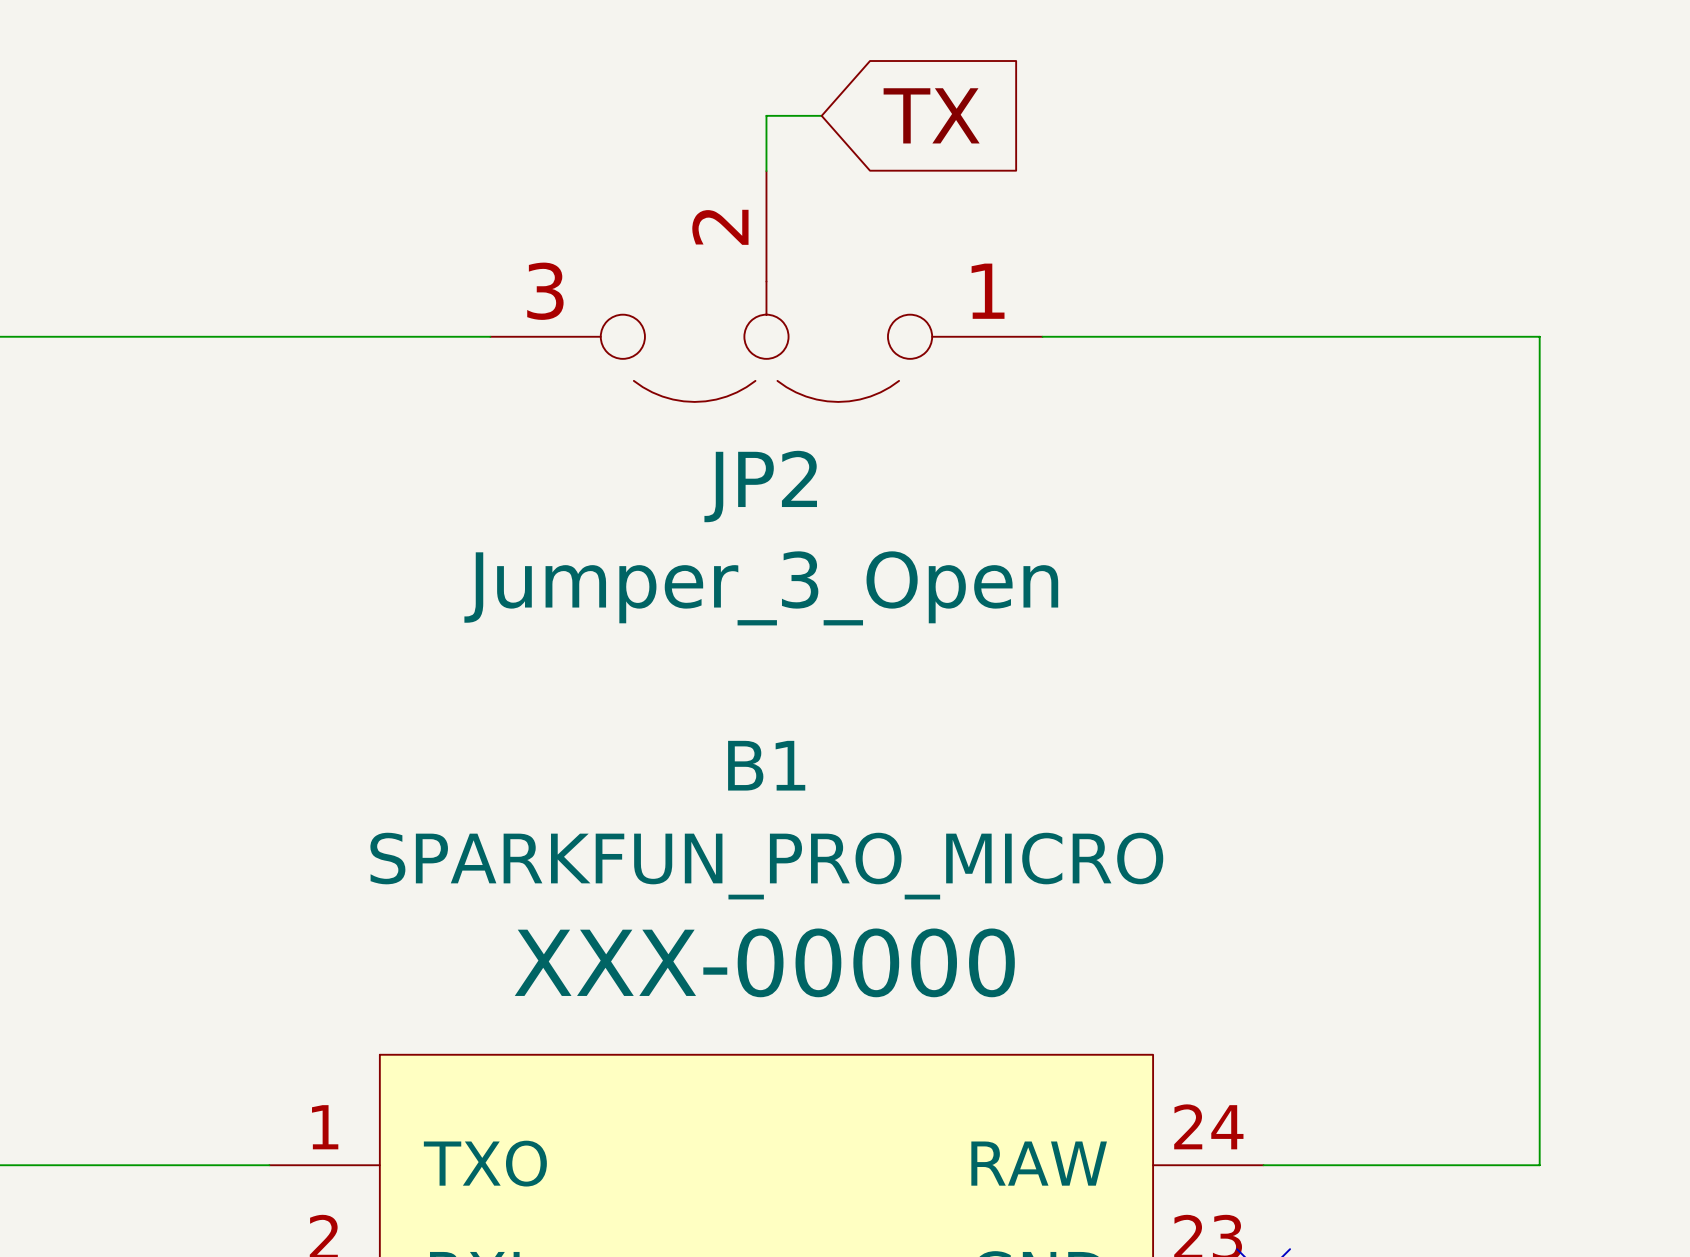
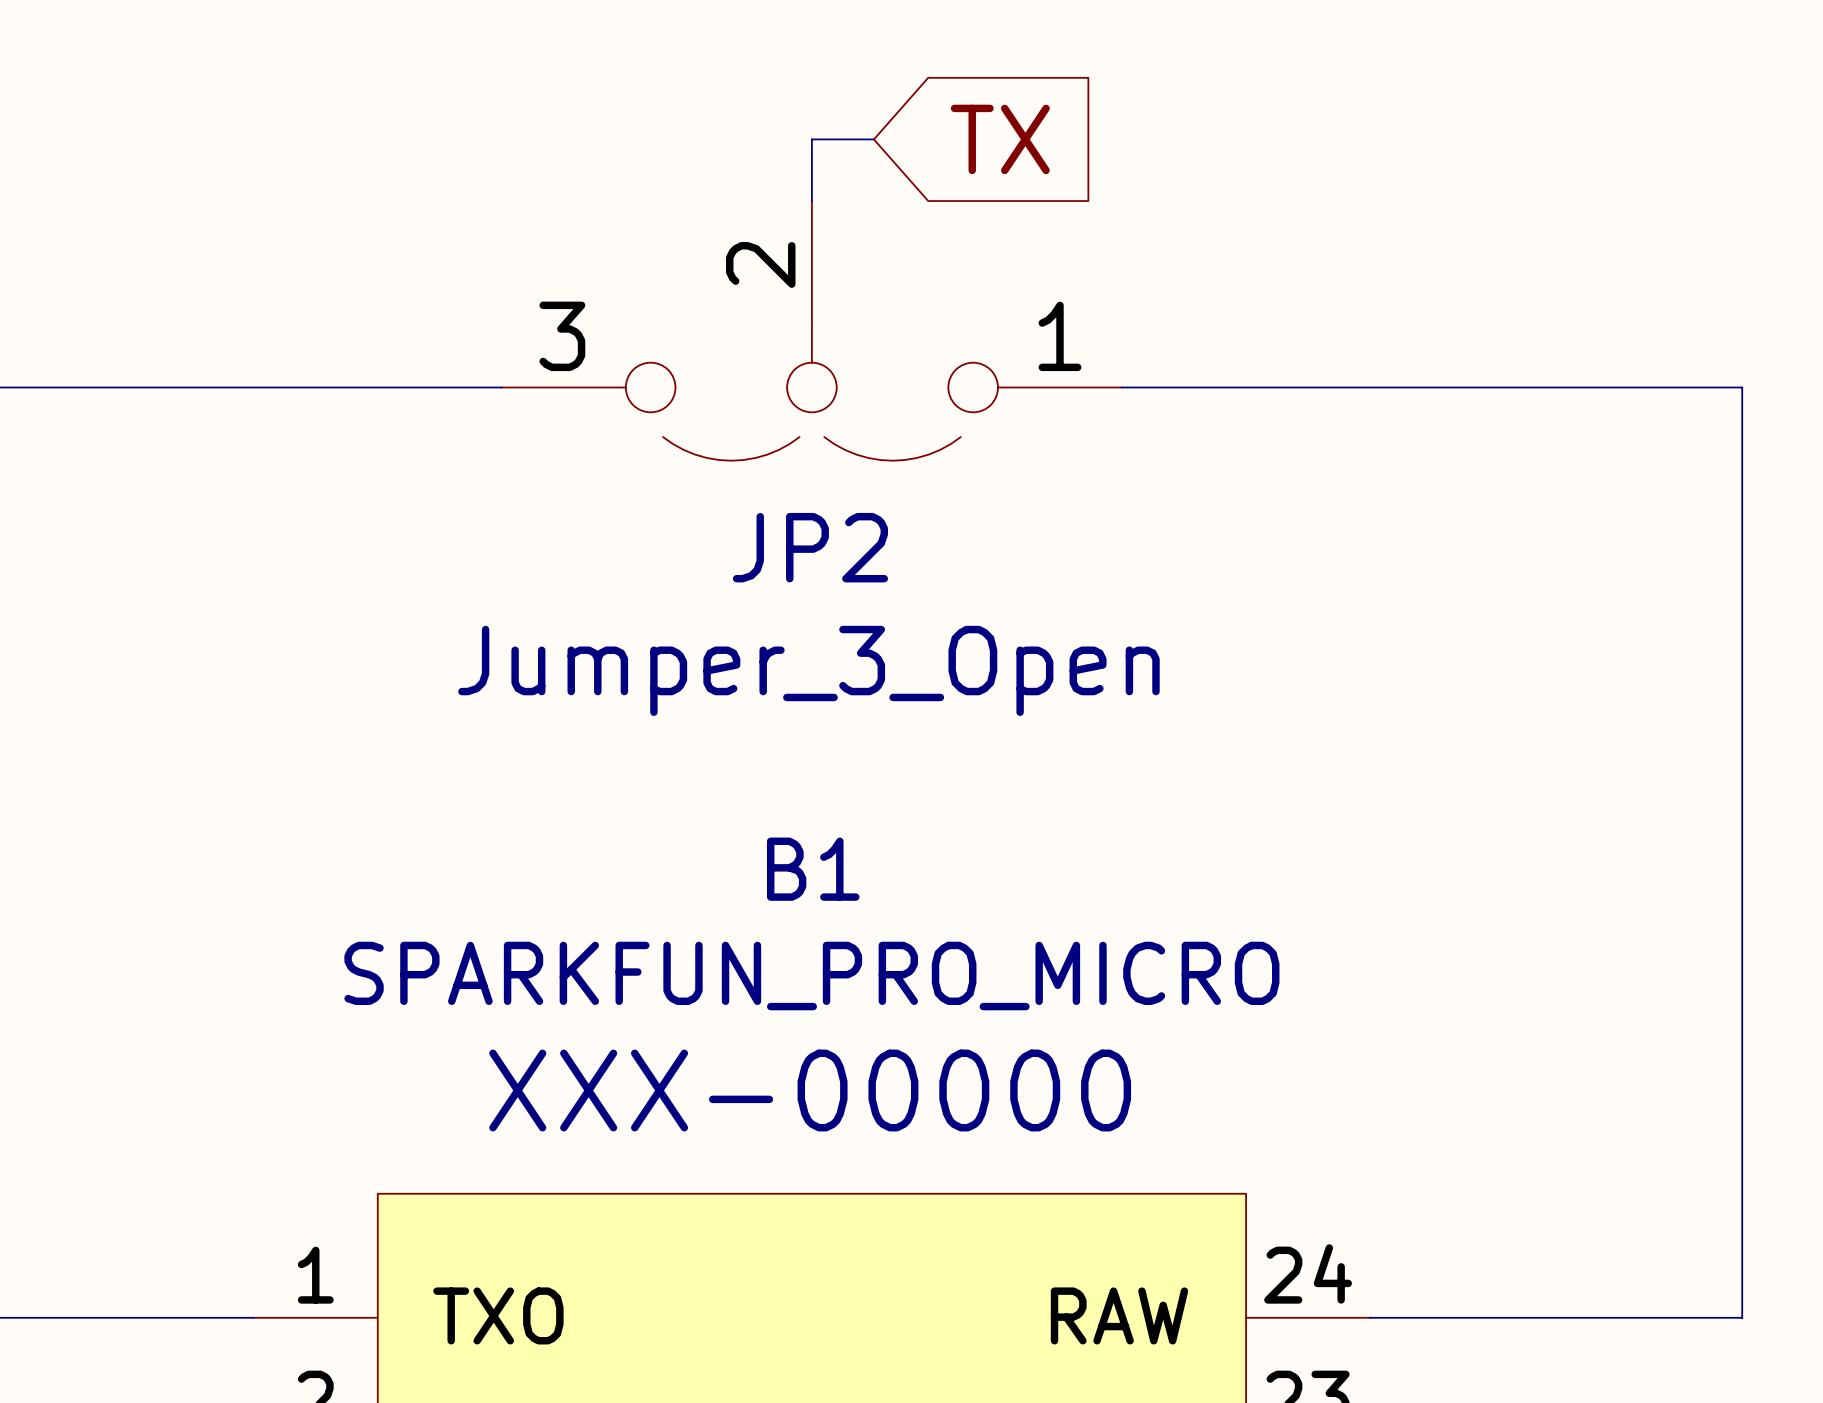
wire: (1539, 336) (1539, 1165) -> (1680, 387) (1742, 387) (1742, 1317) (1680, 1317)

